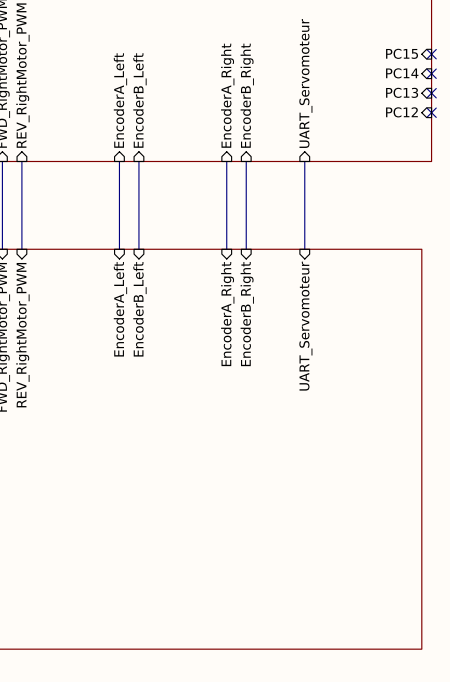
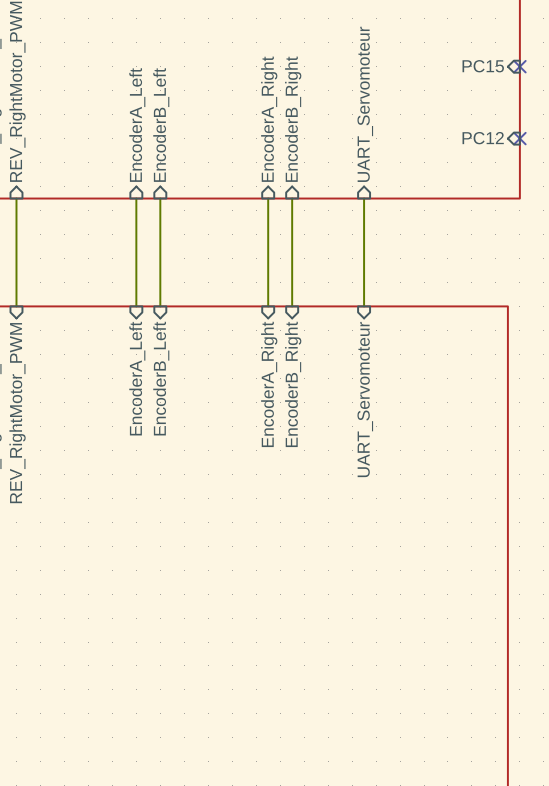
sheet pin: PC14 (402, 73) -> none
no-connect mark: (431, 73) -> none
sheet pin: PC13 (402, 92) -> none
no-connect mark: (431, 93) -> none

